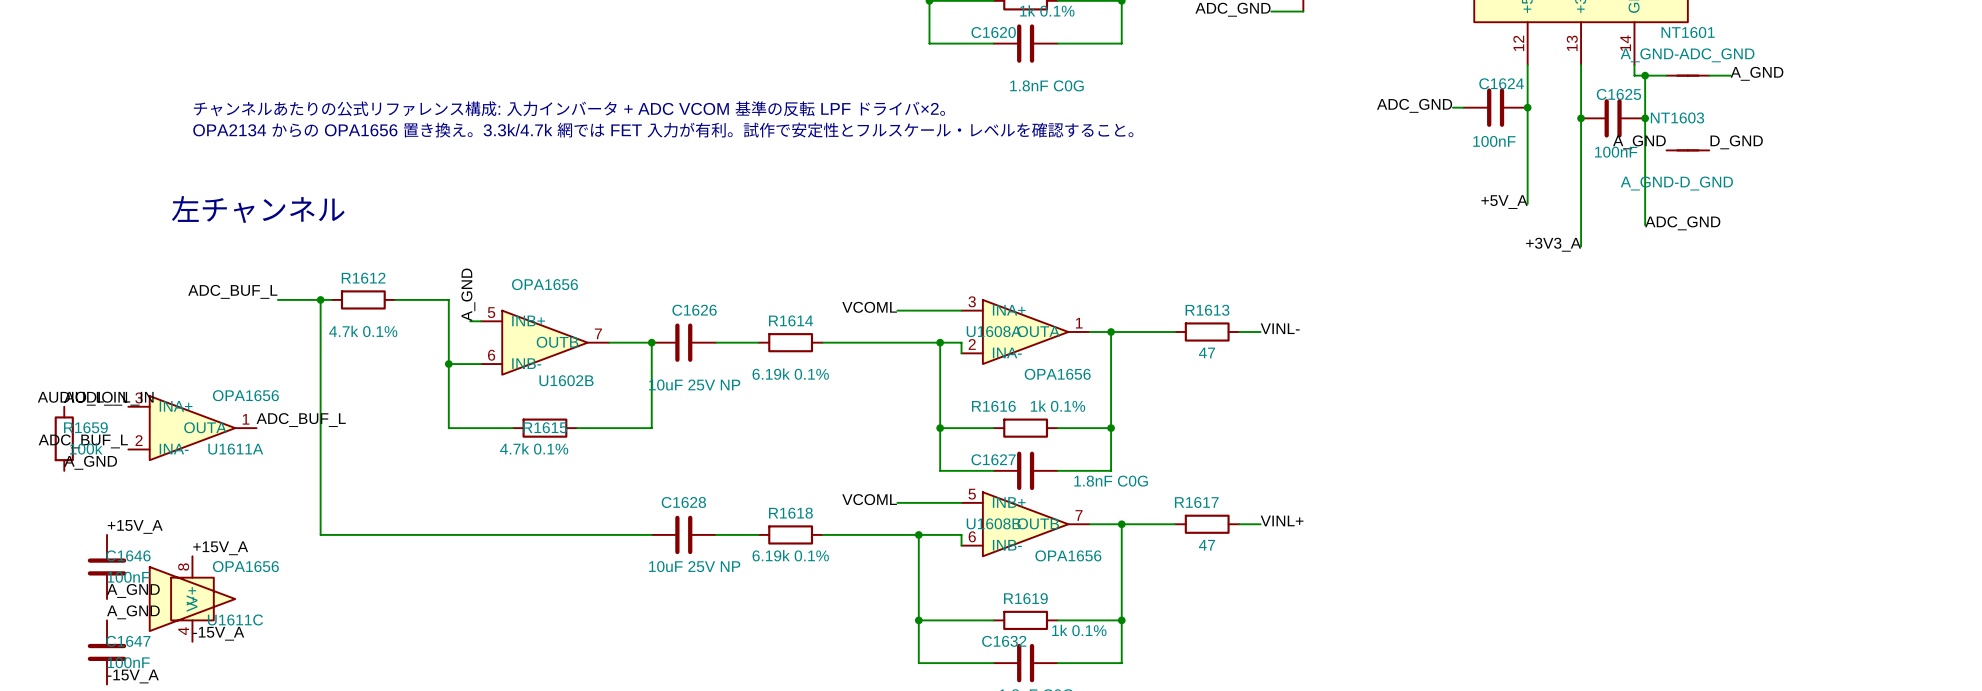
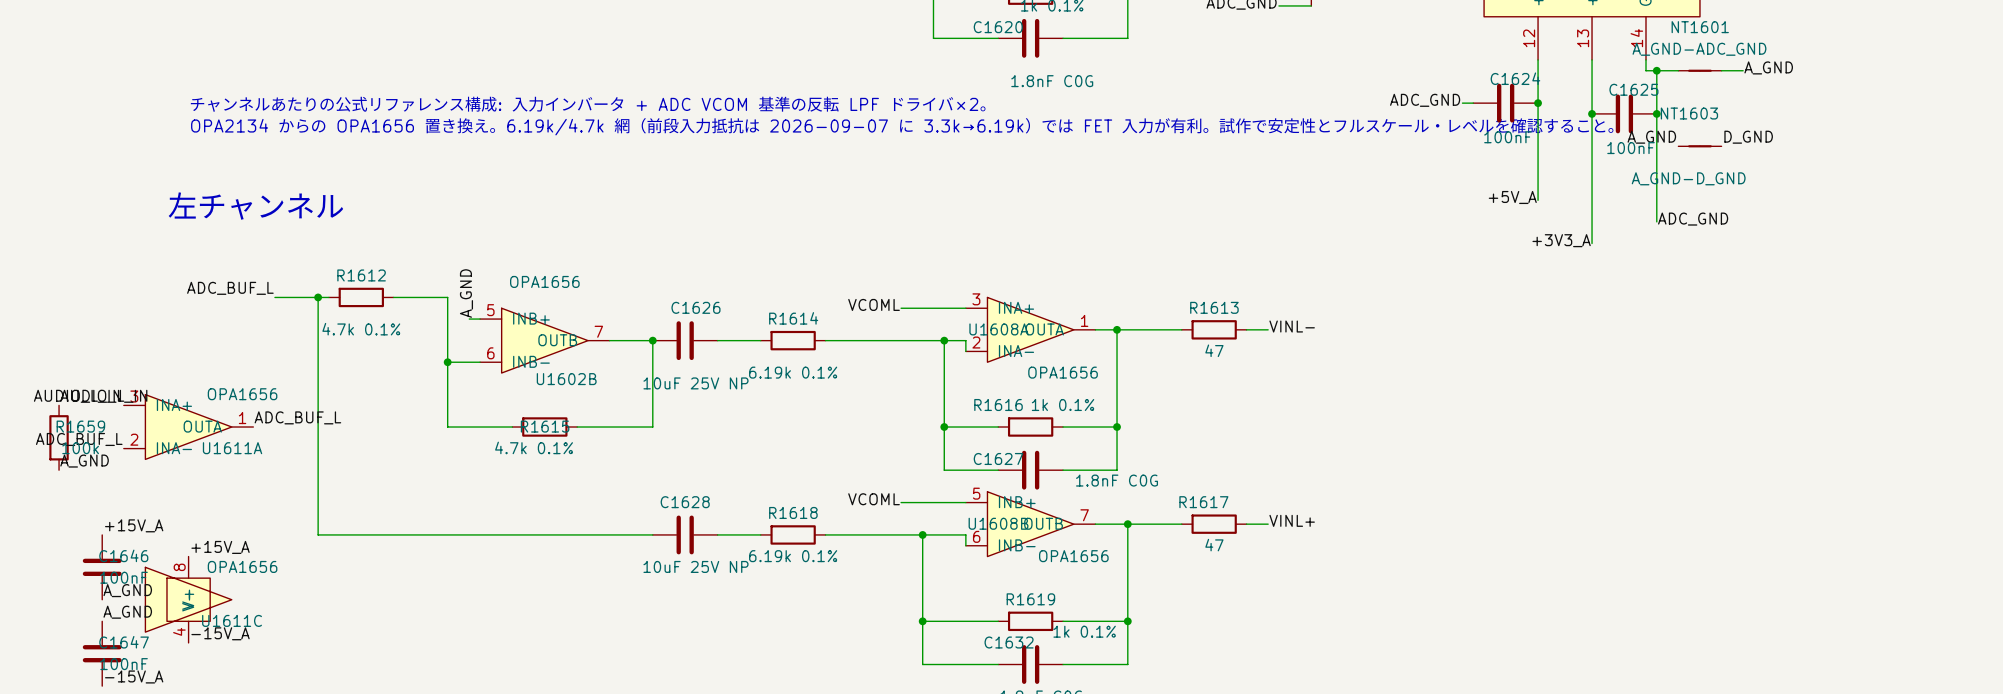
text: OPA2134 からの OPA1656 置き換え。3.3k/4.7k 網では FET 入力が有利。試作で安定性とフルスケール・レベルを確認すること。 (663, 130) -> OPA2134 からの OPA1656 置き換え。6.19k/4.7k 網（前段入力抵抗は 2026-09-07 に 3.3k→6.19k）では FET 入力が有利。試作で安定性とフルスケール・レベルを確認すること。 (902, 126)

